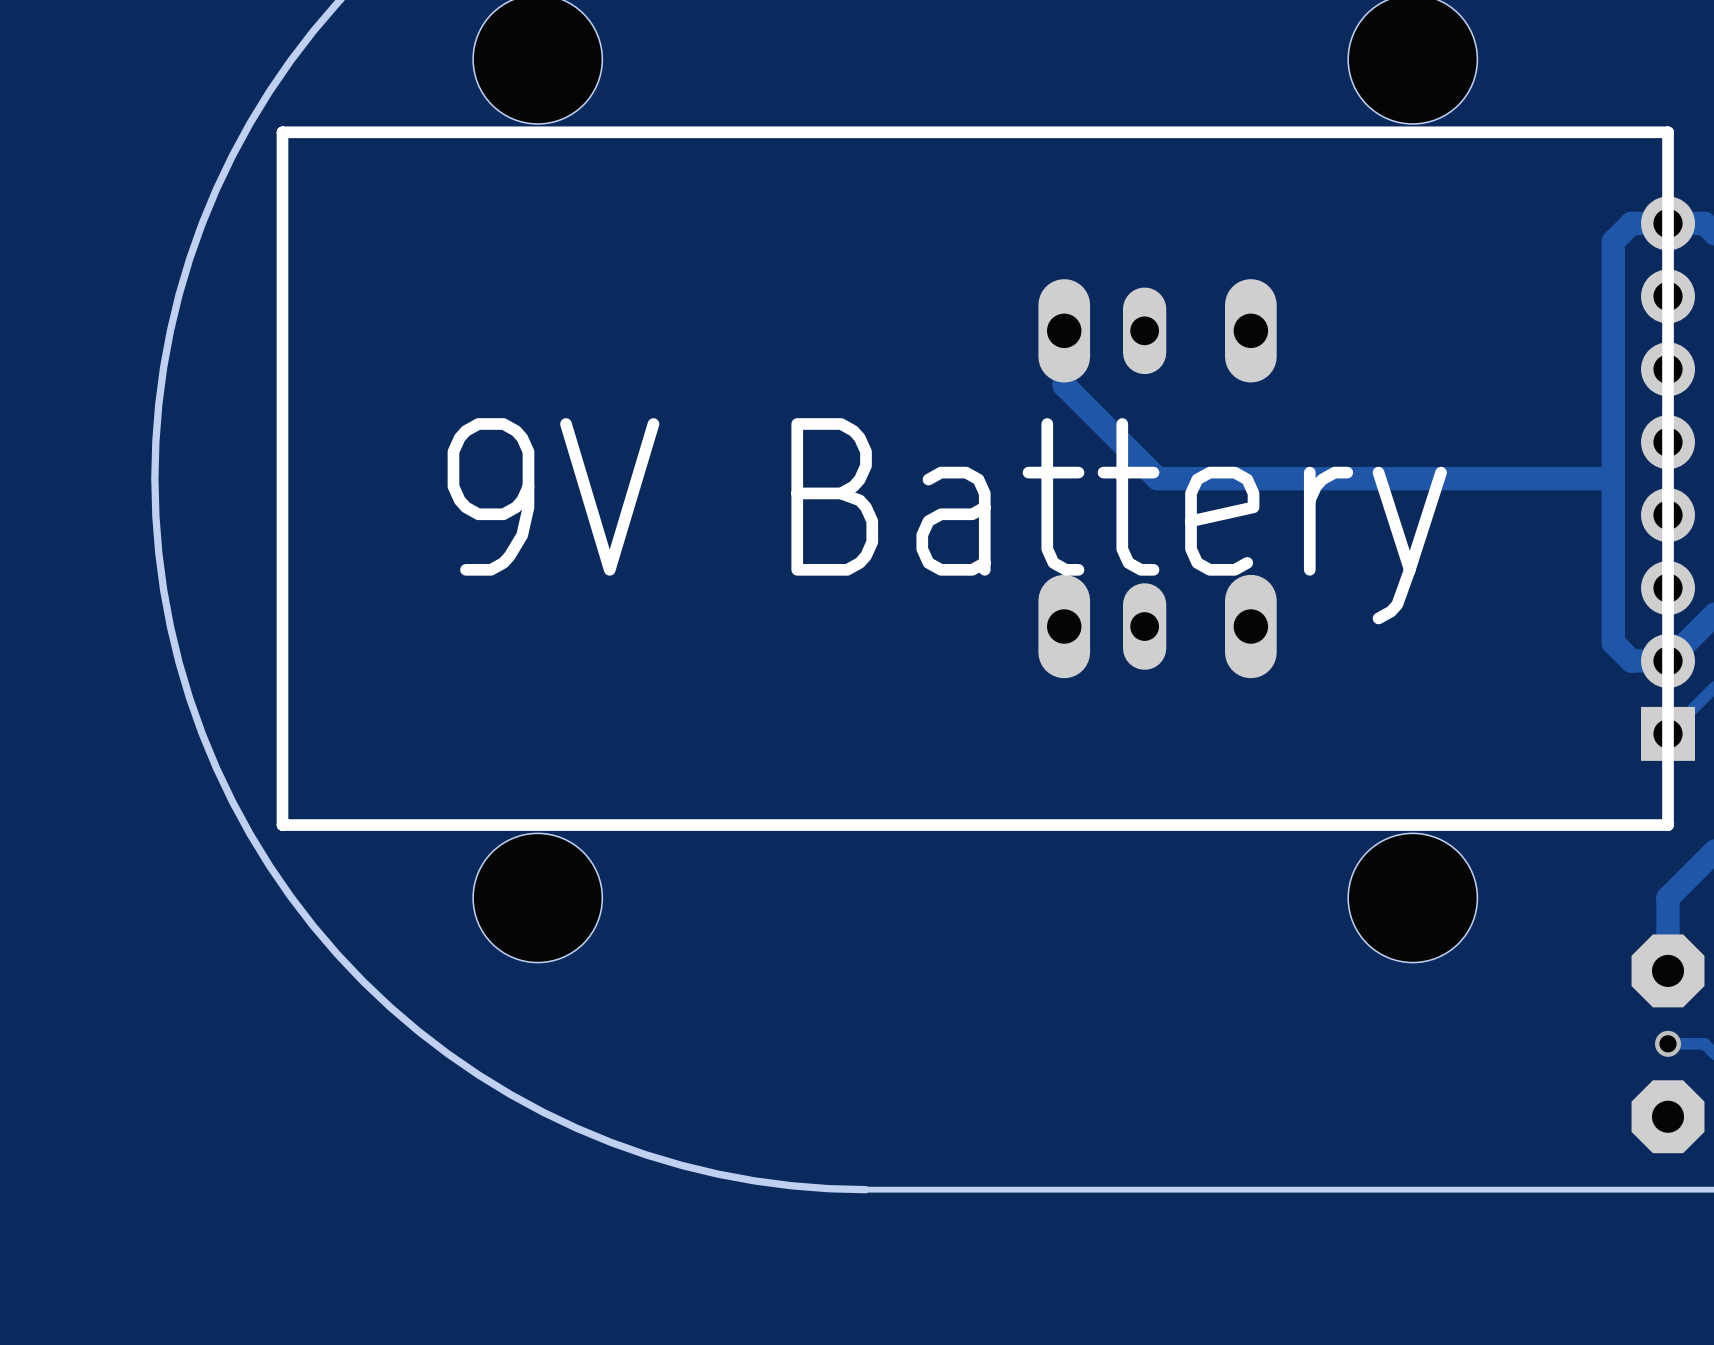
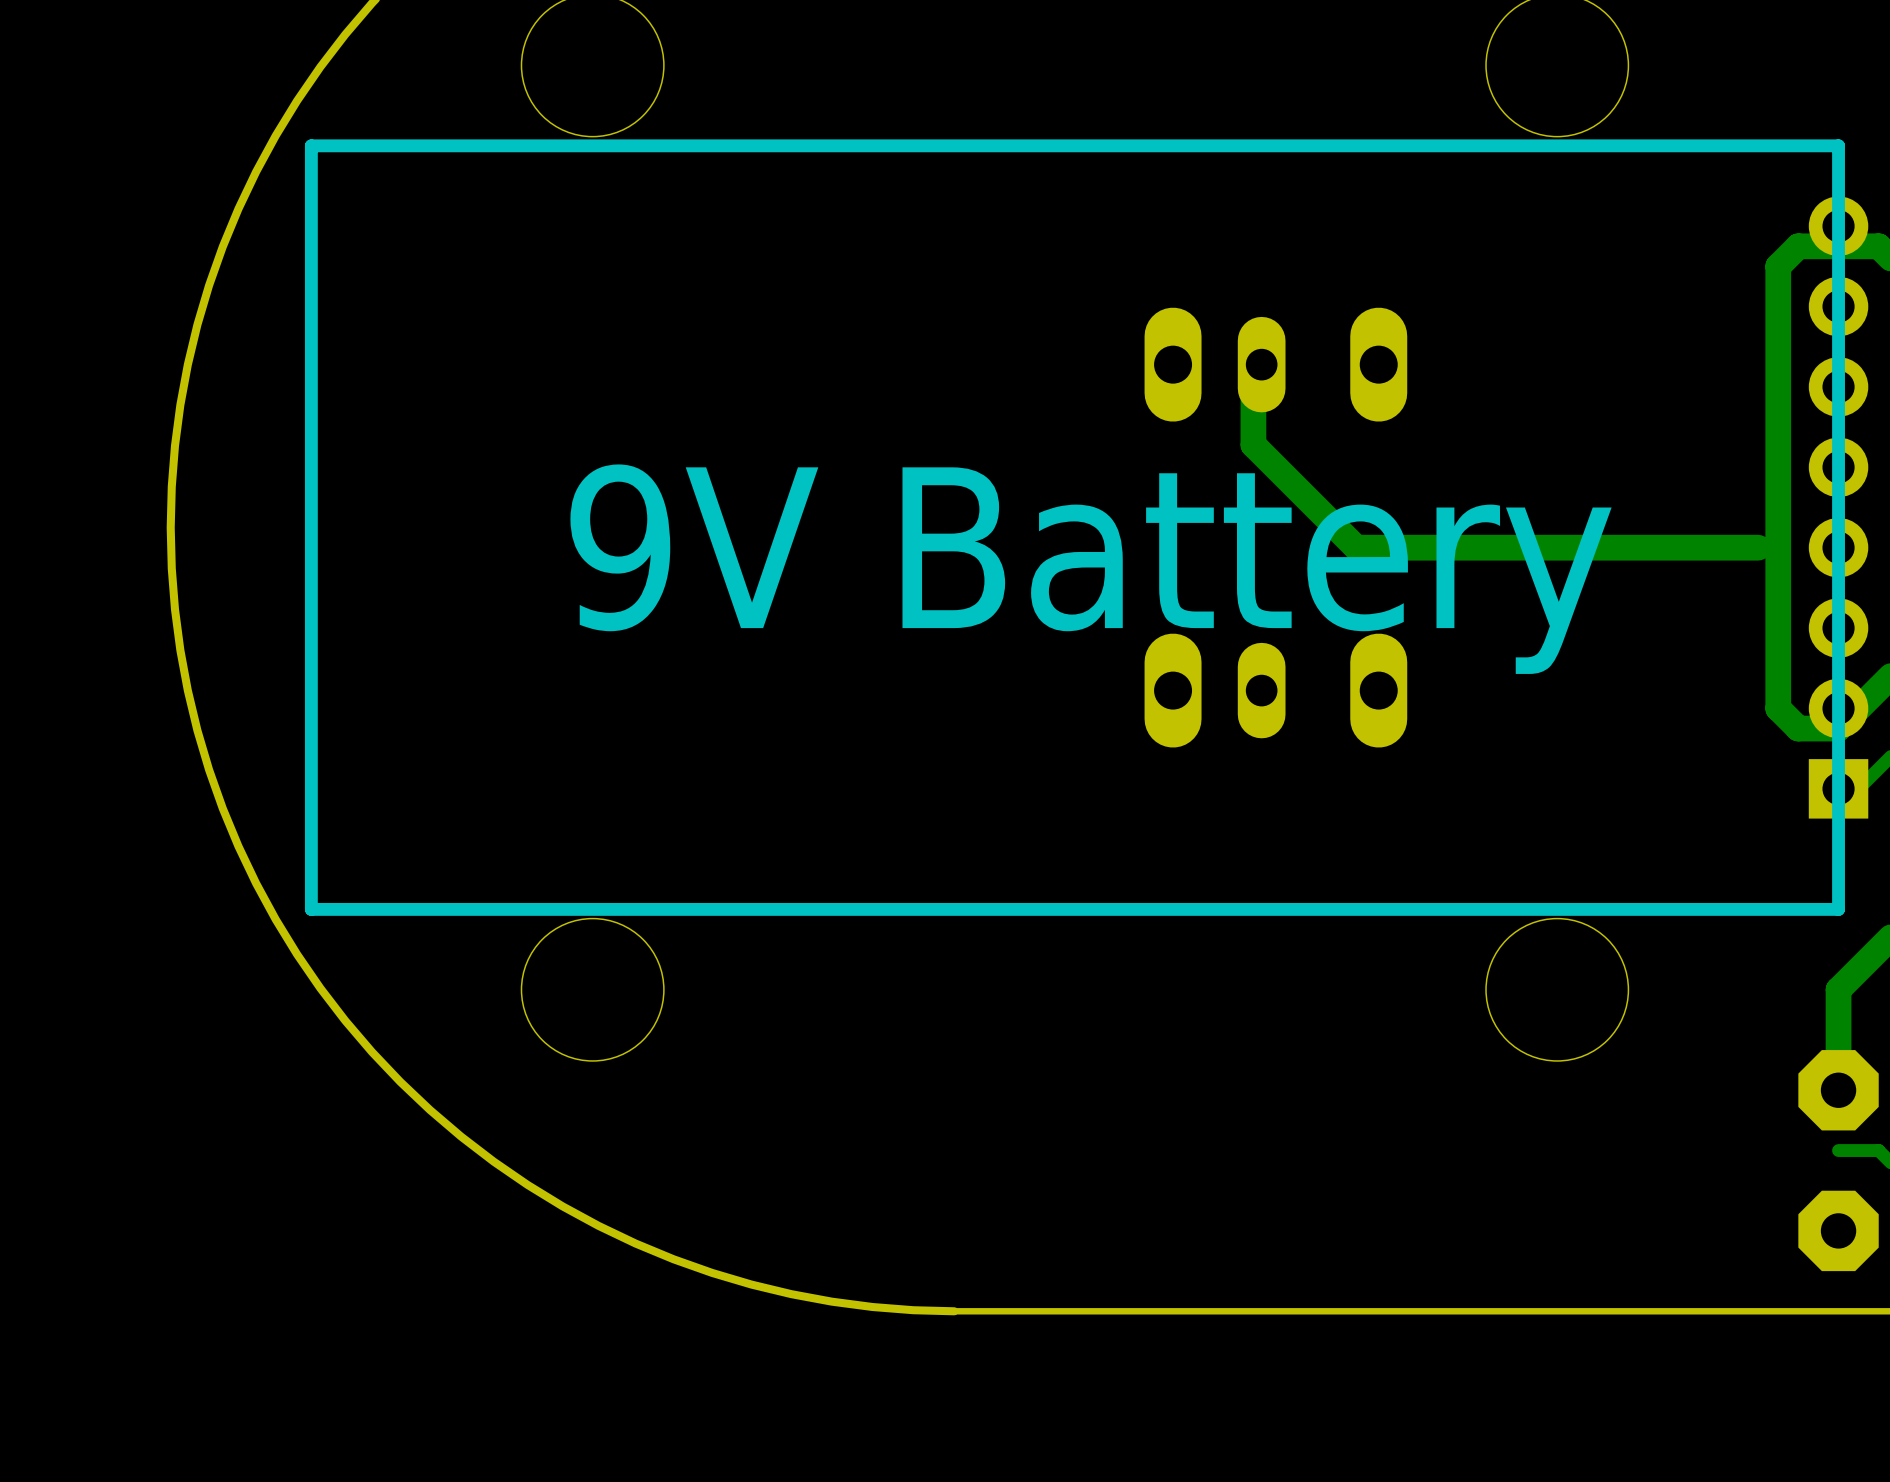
track: (1064, 330) (1064, 385) (1157, 478) (1613, 478) -> none
track: none -> (1253, 384) (1253, 444) (1356, 547) (1758, 547)
part position: (1668, 478) -> (1838, 507)
part position: (1668, 970) -> (1838, 1090)
via: (1668, 1043) -> none

